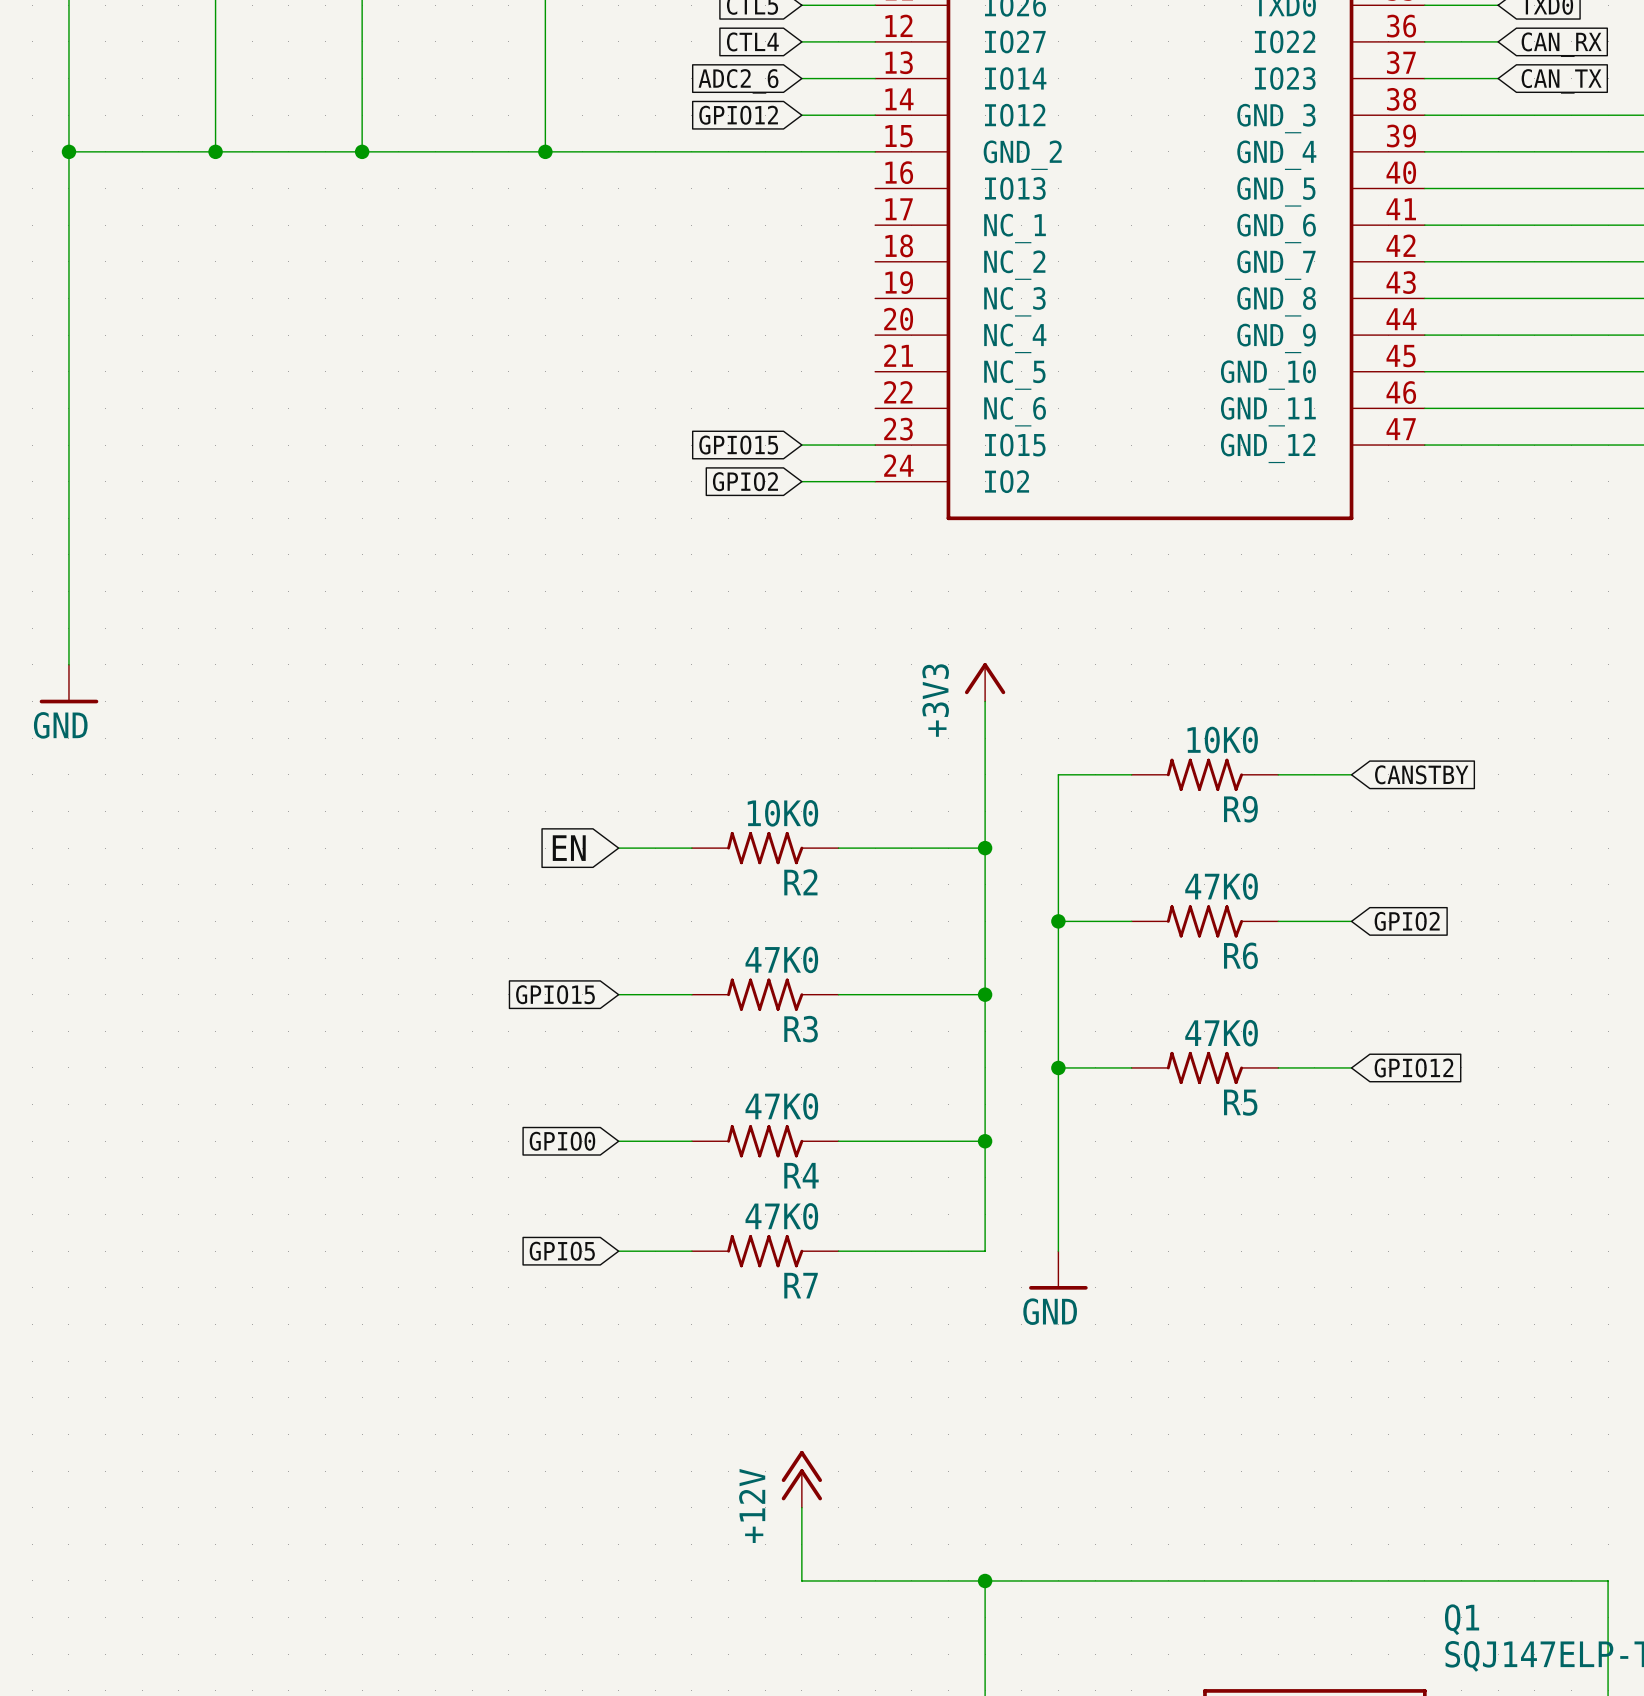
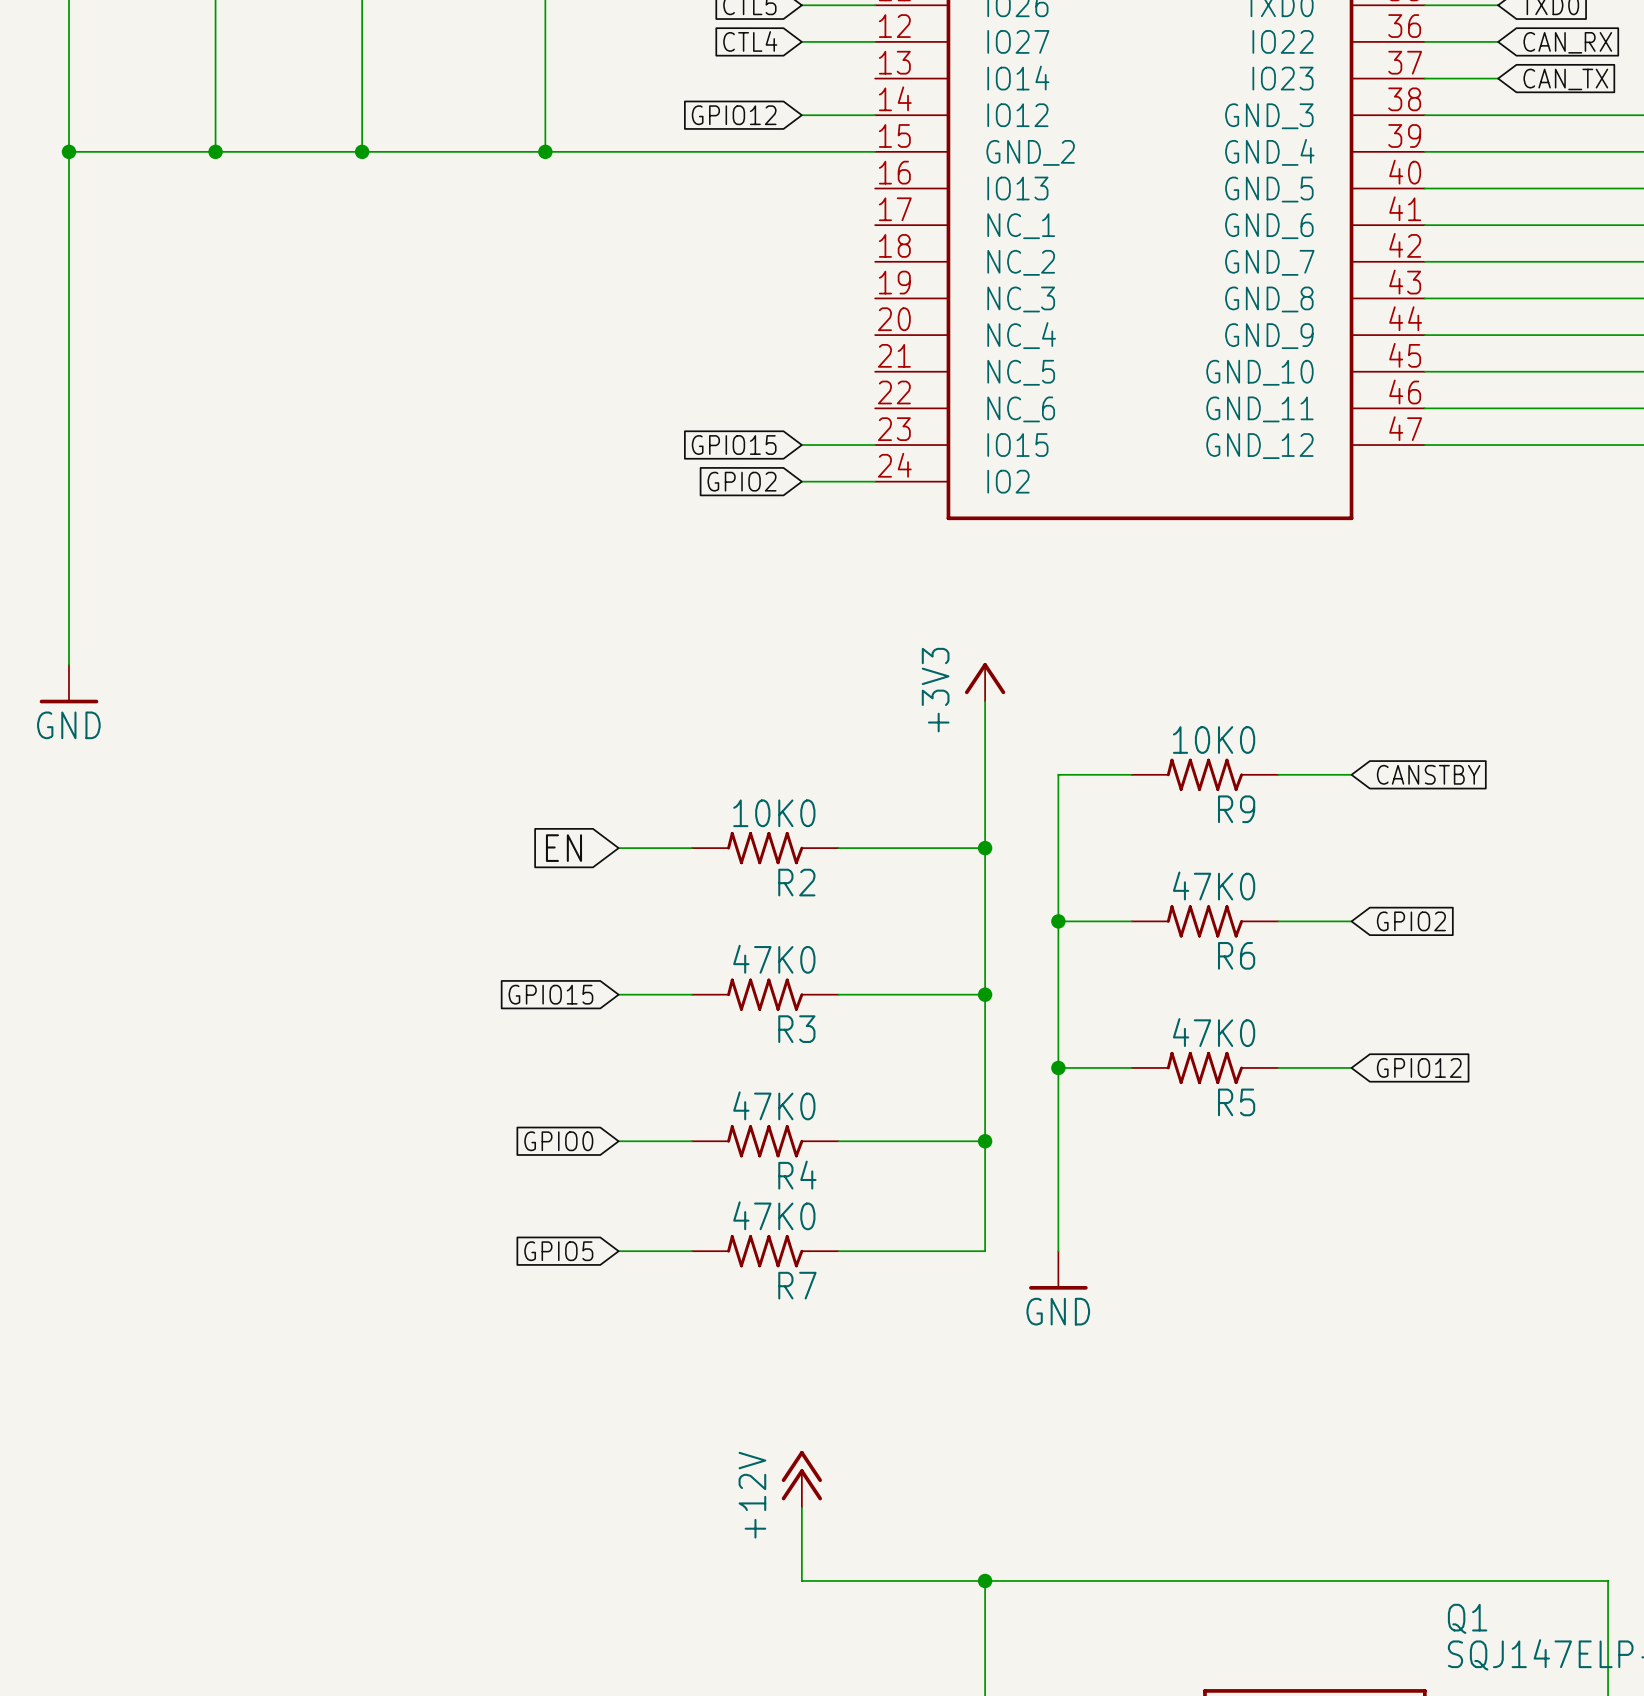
wire: (801, 78) (875, 78) -> none
global label: ADC2_6 (738, 81) -> none

